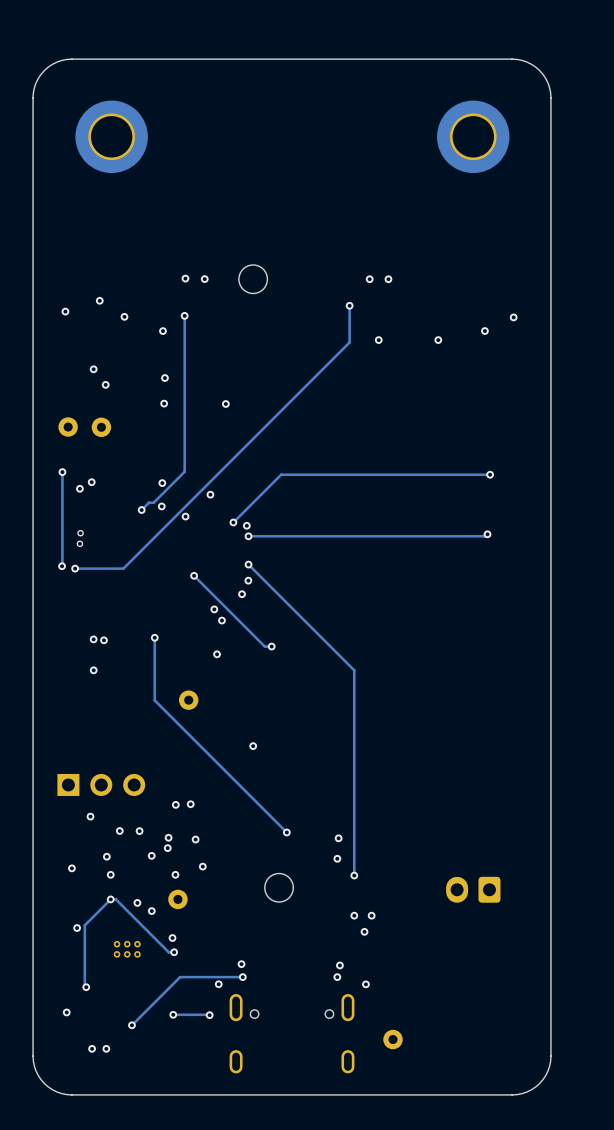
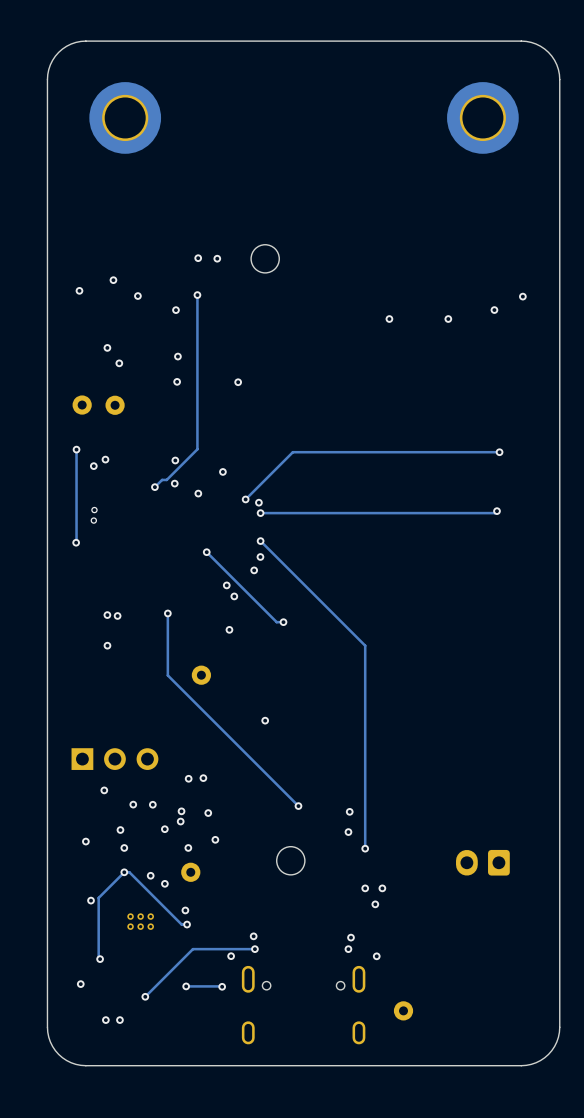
via: (369, 279) -> none
via: (388, 279) -> none
track: (349, 305) (349, 342) (123, 568) (75, 568) -> none
via: (349, 305) -> none
via: (75, 568) -> none

